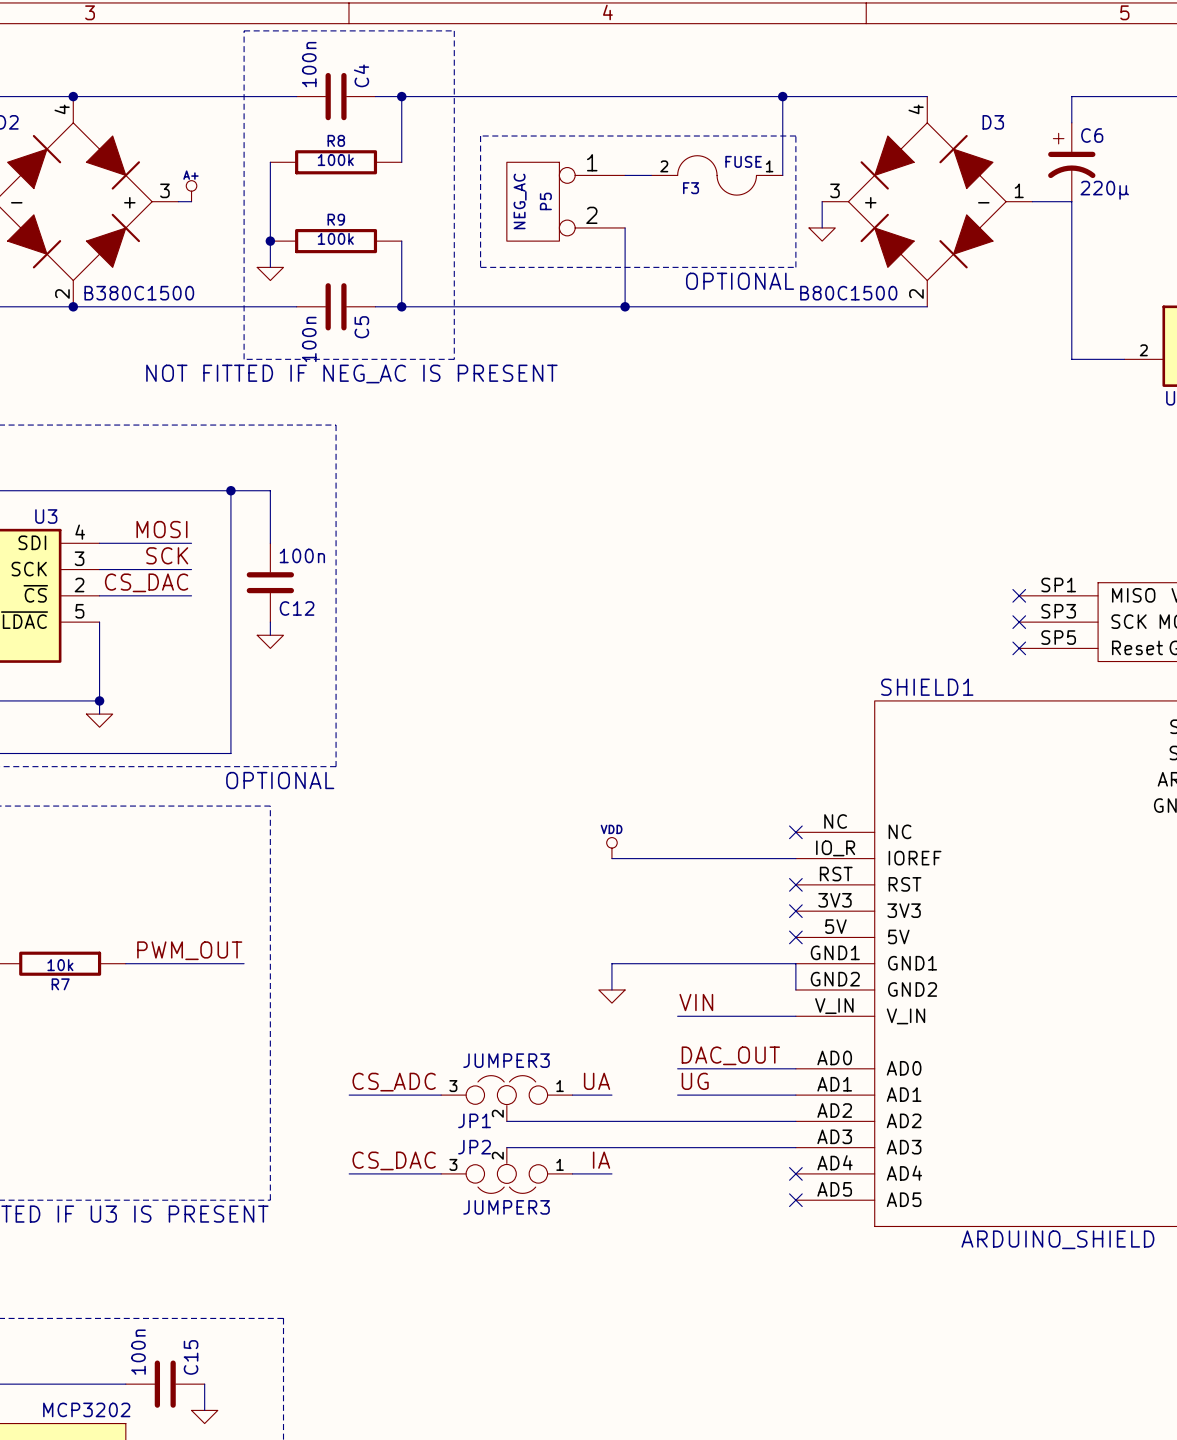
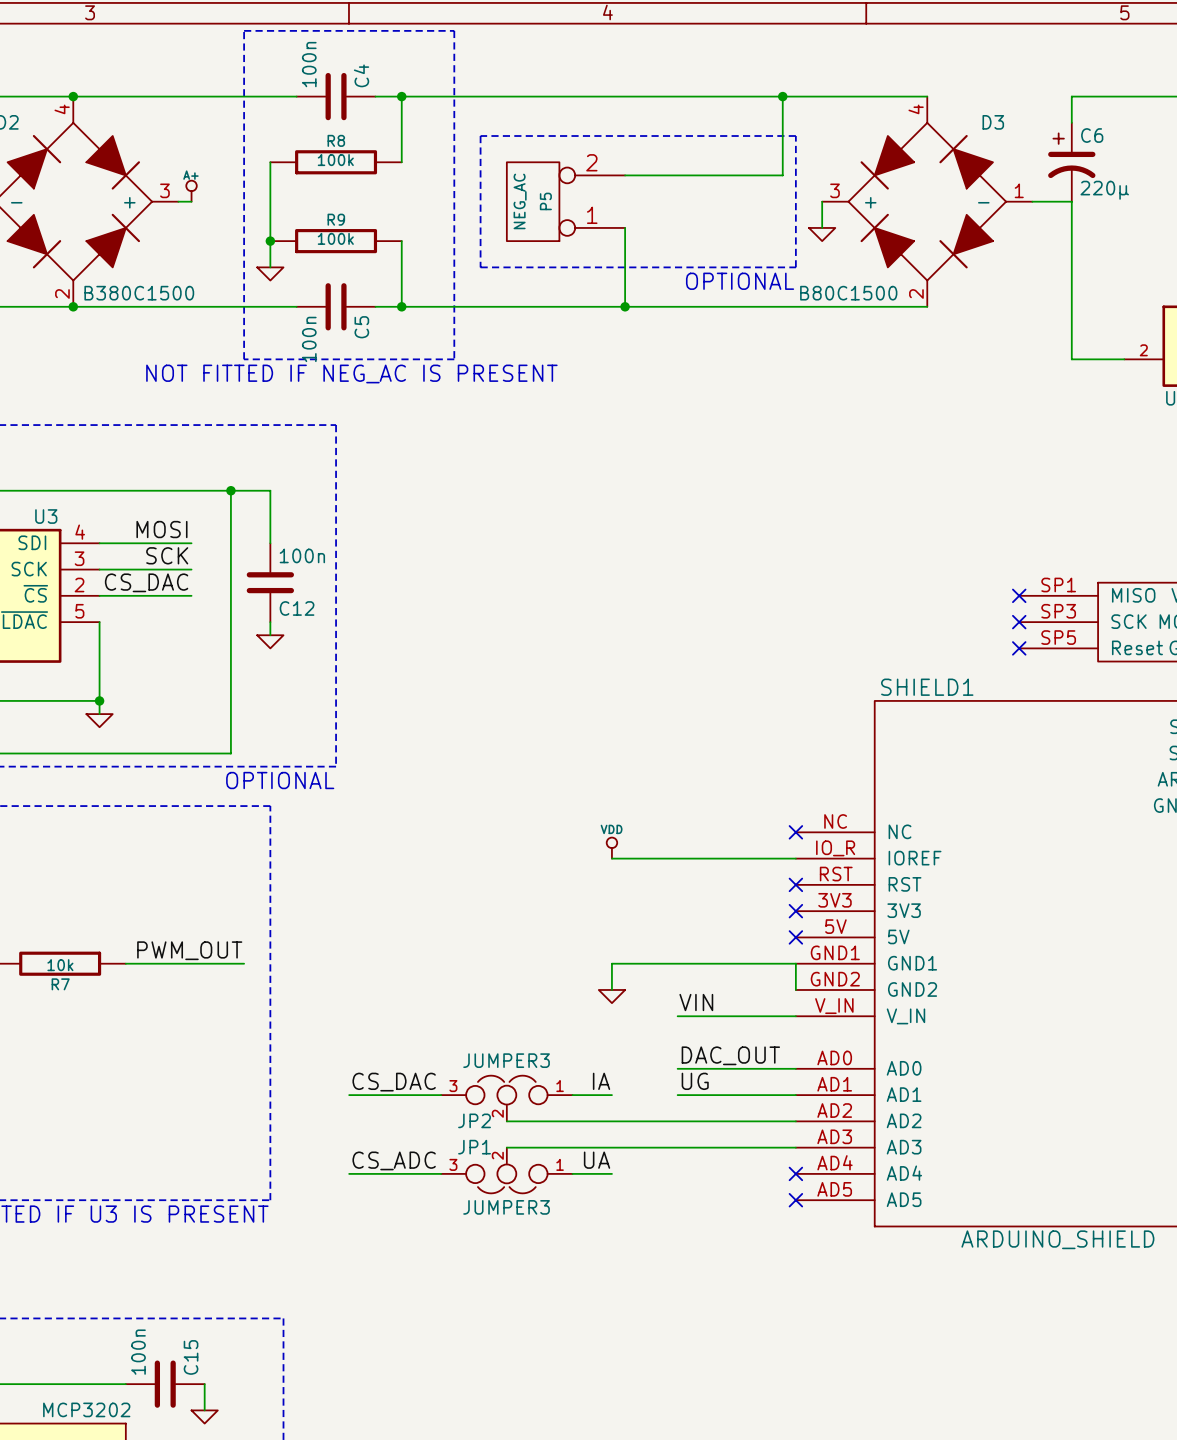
wire: none -> (651, 175) (782, 175)
F3: FUSE (717, 175) -> none
P5 flip: as is (533, 201) -> up-down (533, 201)
label: UA (597, 1081) -> IA (601, 1081)
label: CS_ADC (394, 1082) -> CS_DAC (394, 1082)
JP1 name: JP1 (474, 1120) -> JP2 (474, 1120)
JP2 name: JP2 (474, 1147) -> JP1 (474, 1147)
label: CS_DAC (394, 1160) -> CS_ADC (394, 1160)
label: IA (601, 1160) -> UA (597, 1160)

